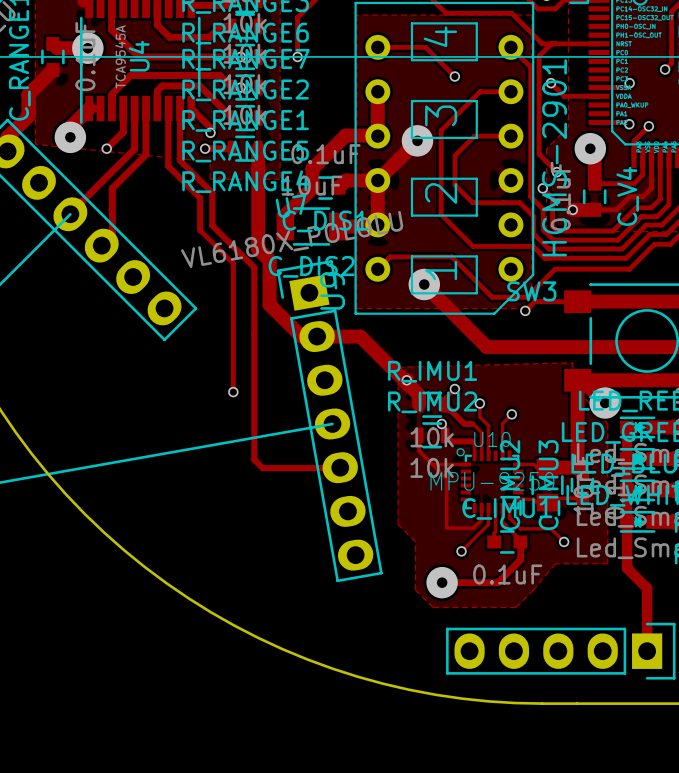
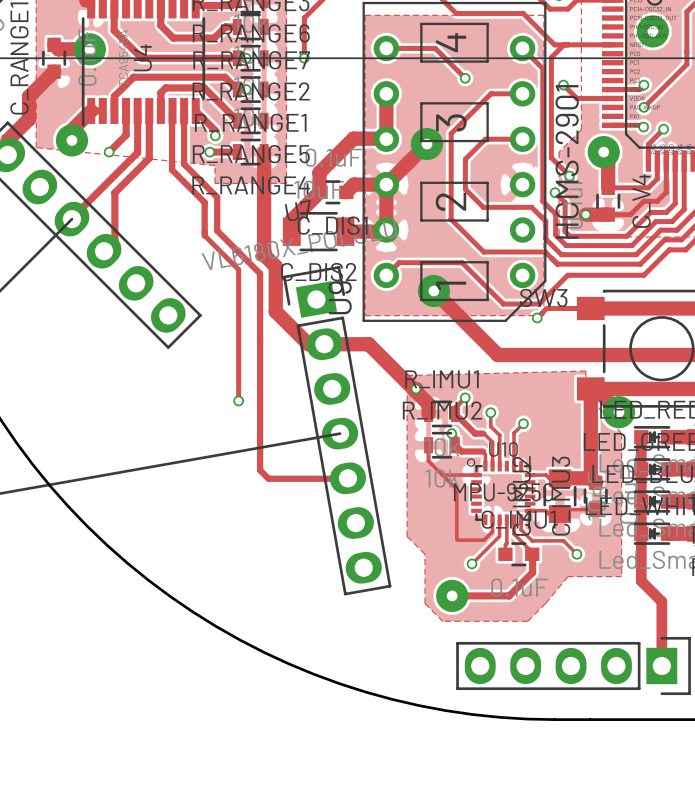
via: none -> (652, 31)
track: none -> (680, 71) (643, 107)
via position: (665, 69) -> (643, 107)

